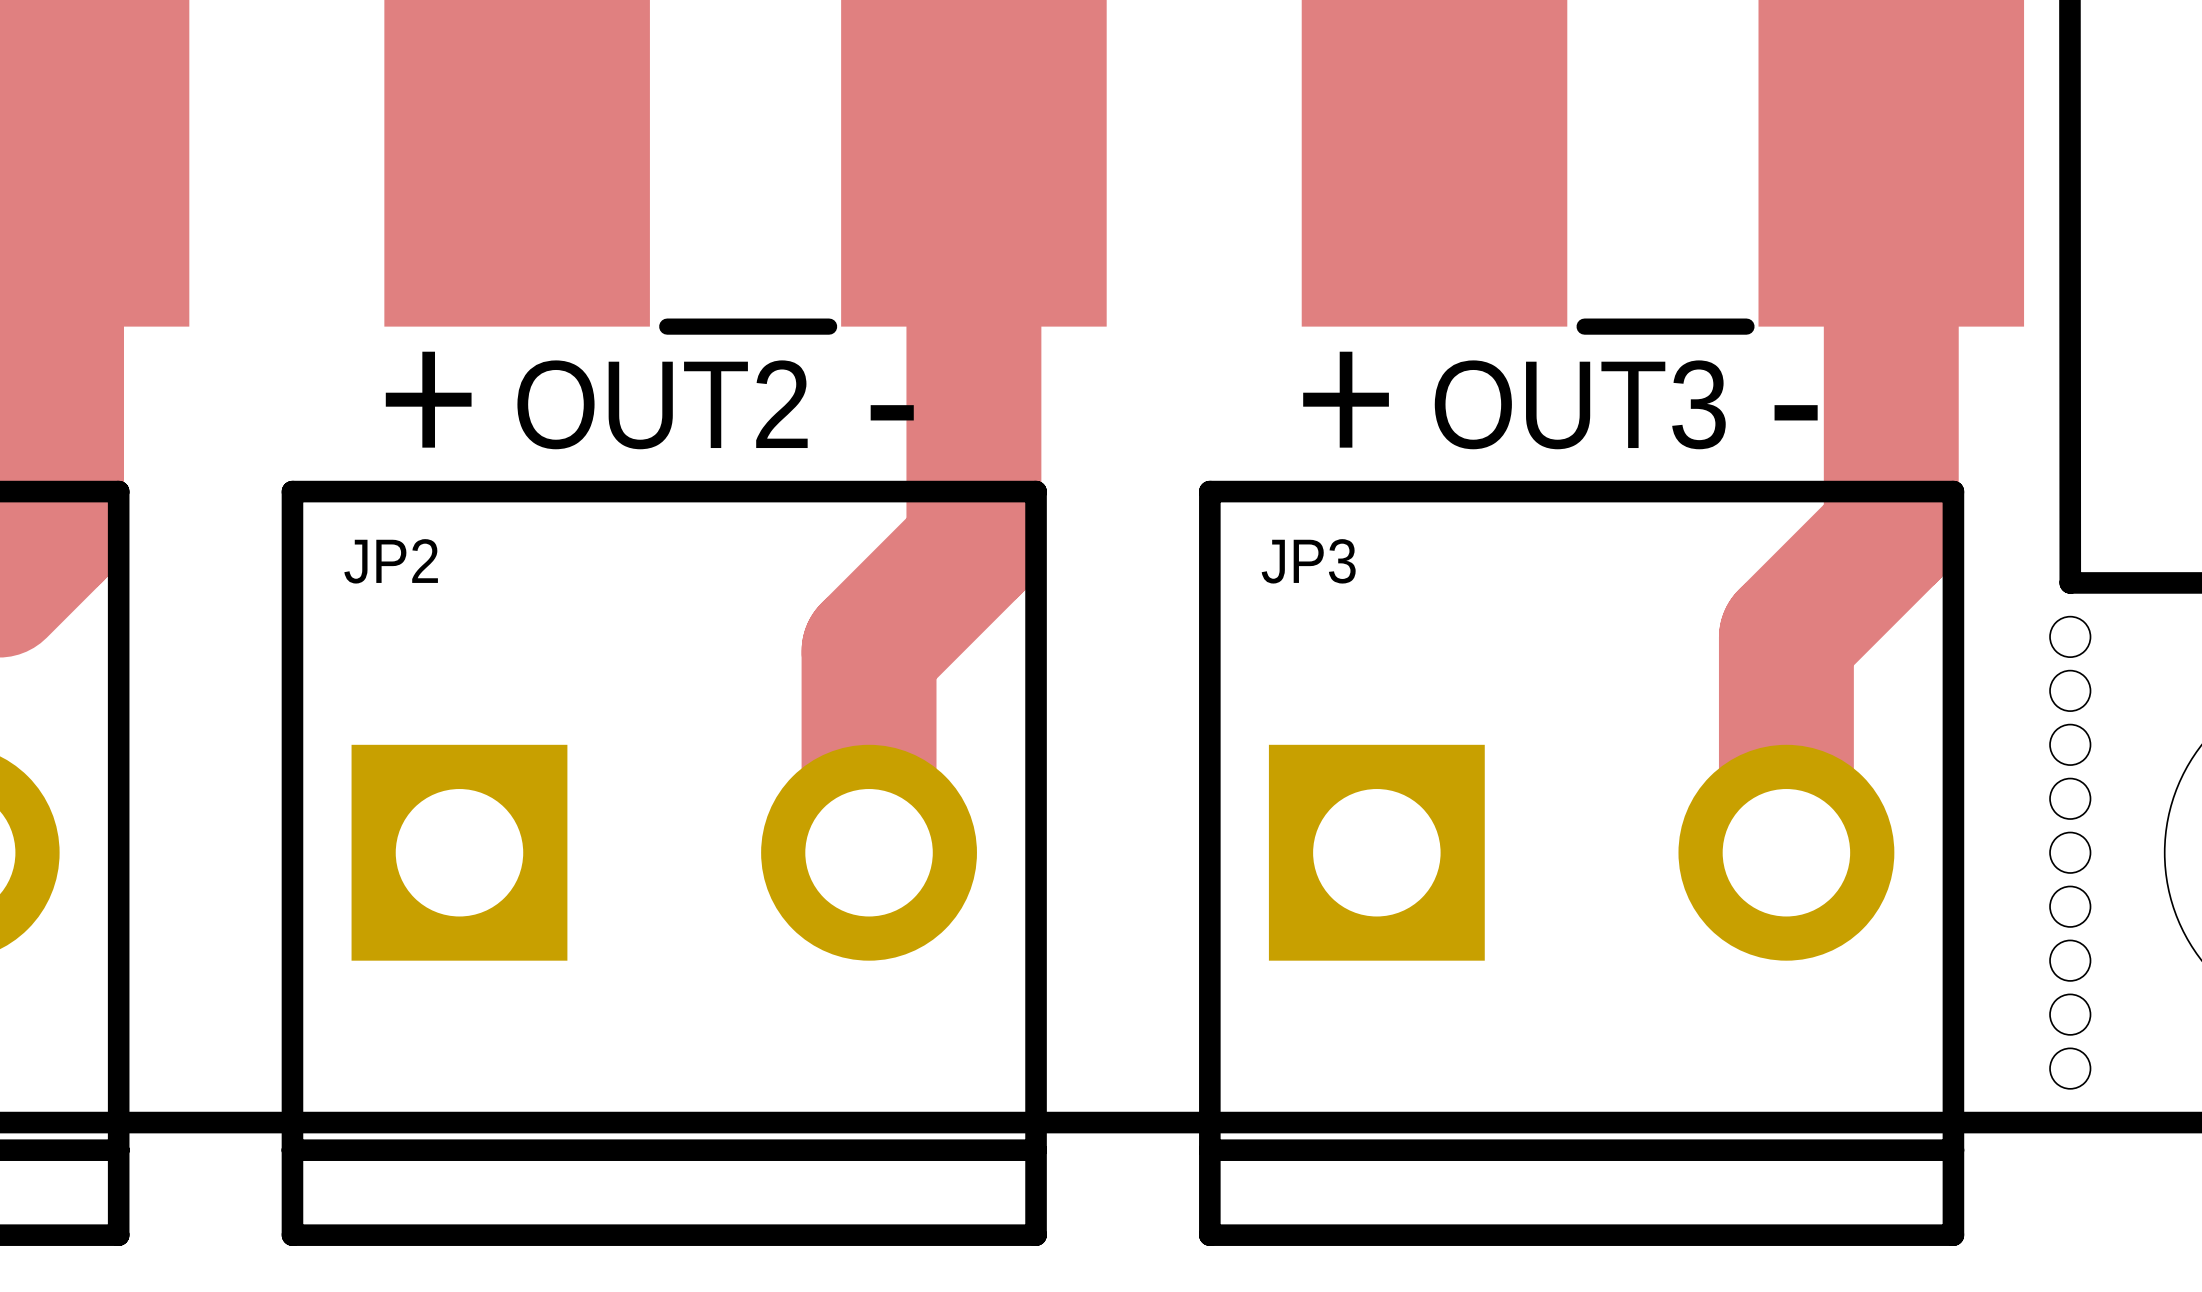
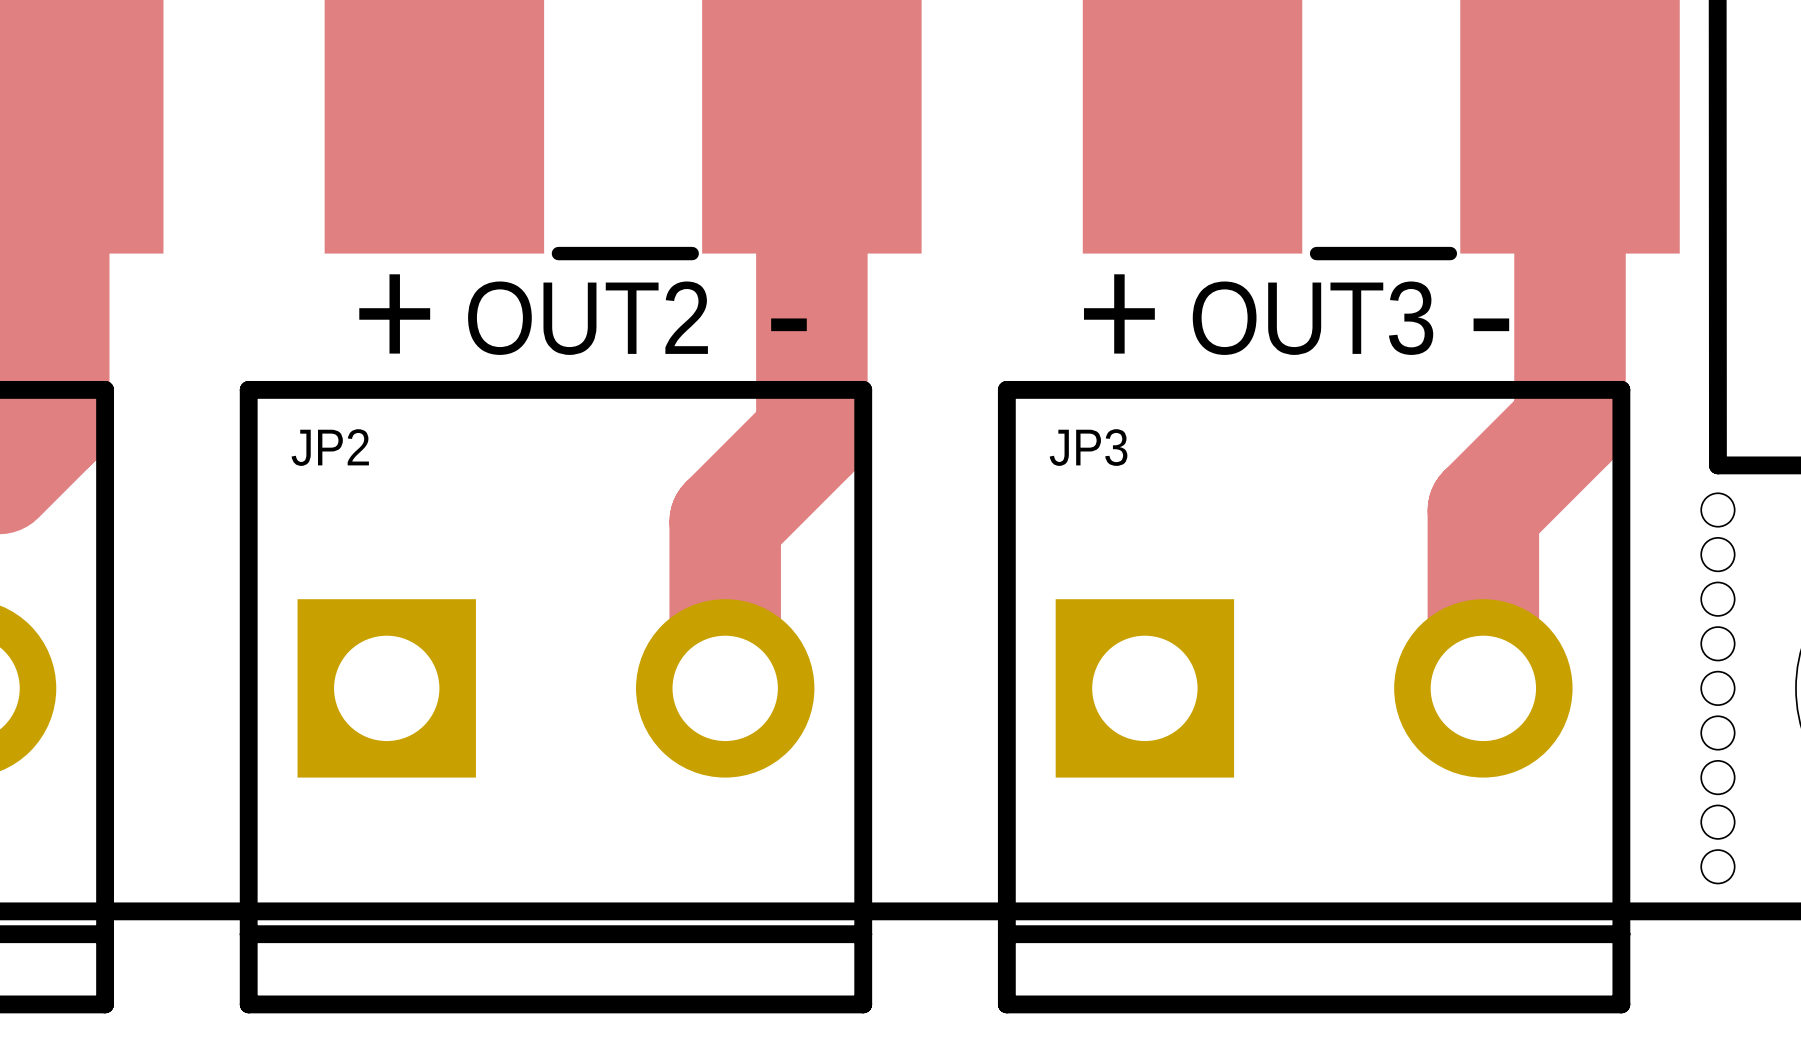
text position: + (428, 399) -> + (394, 313)
text position: OUT2 (662, 404) -> OUT2 (588, 318)
text position: - (892, 412) -> - (788, 324)

